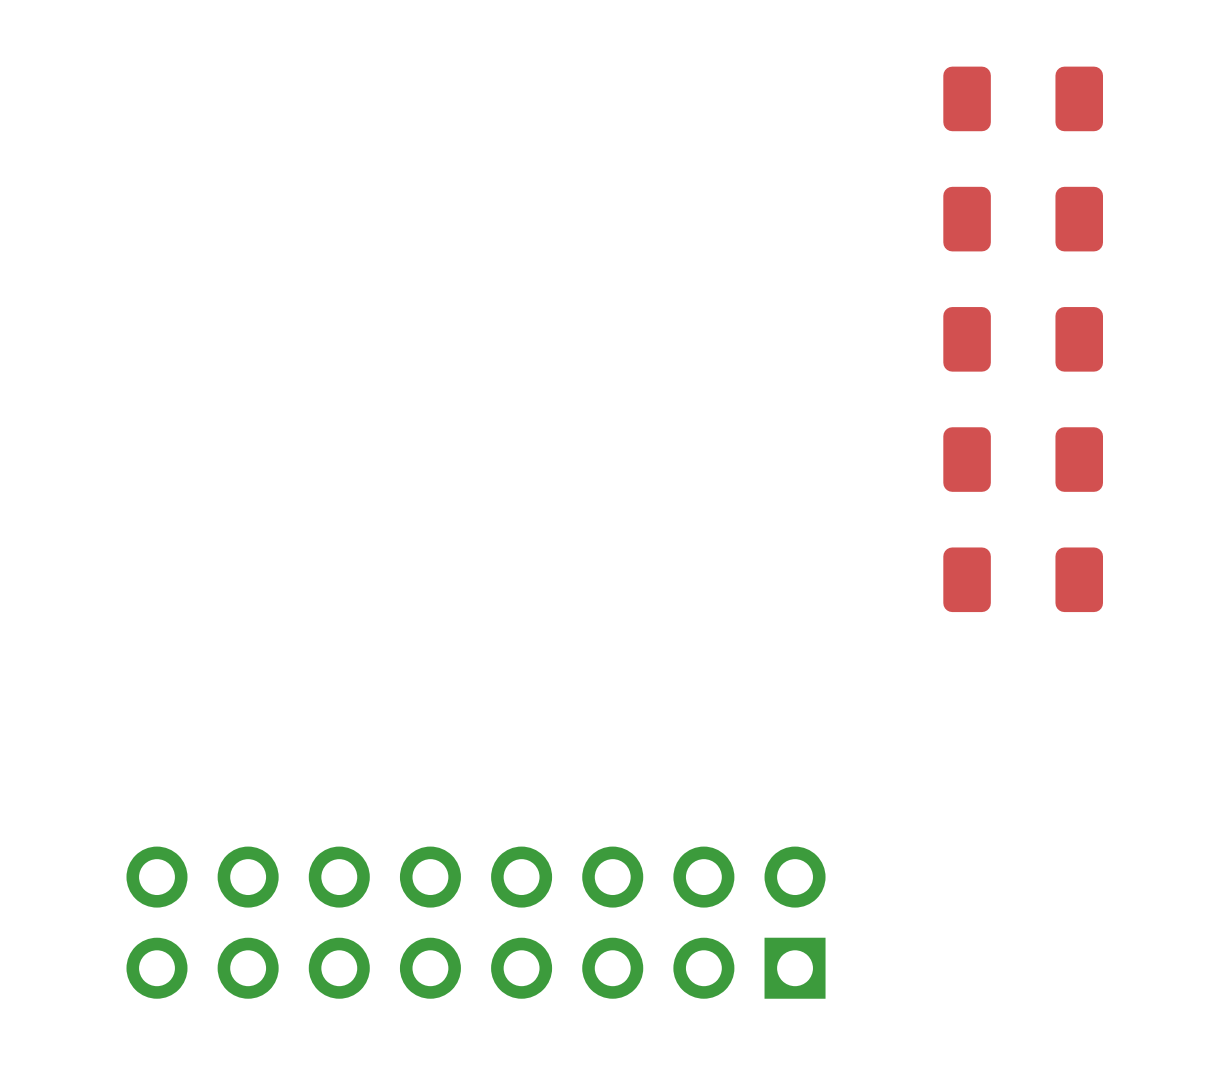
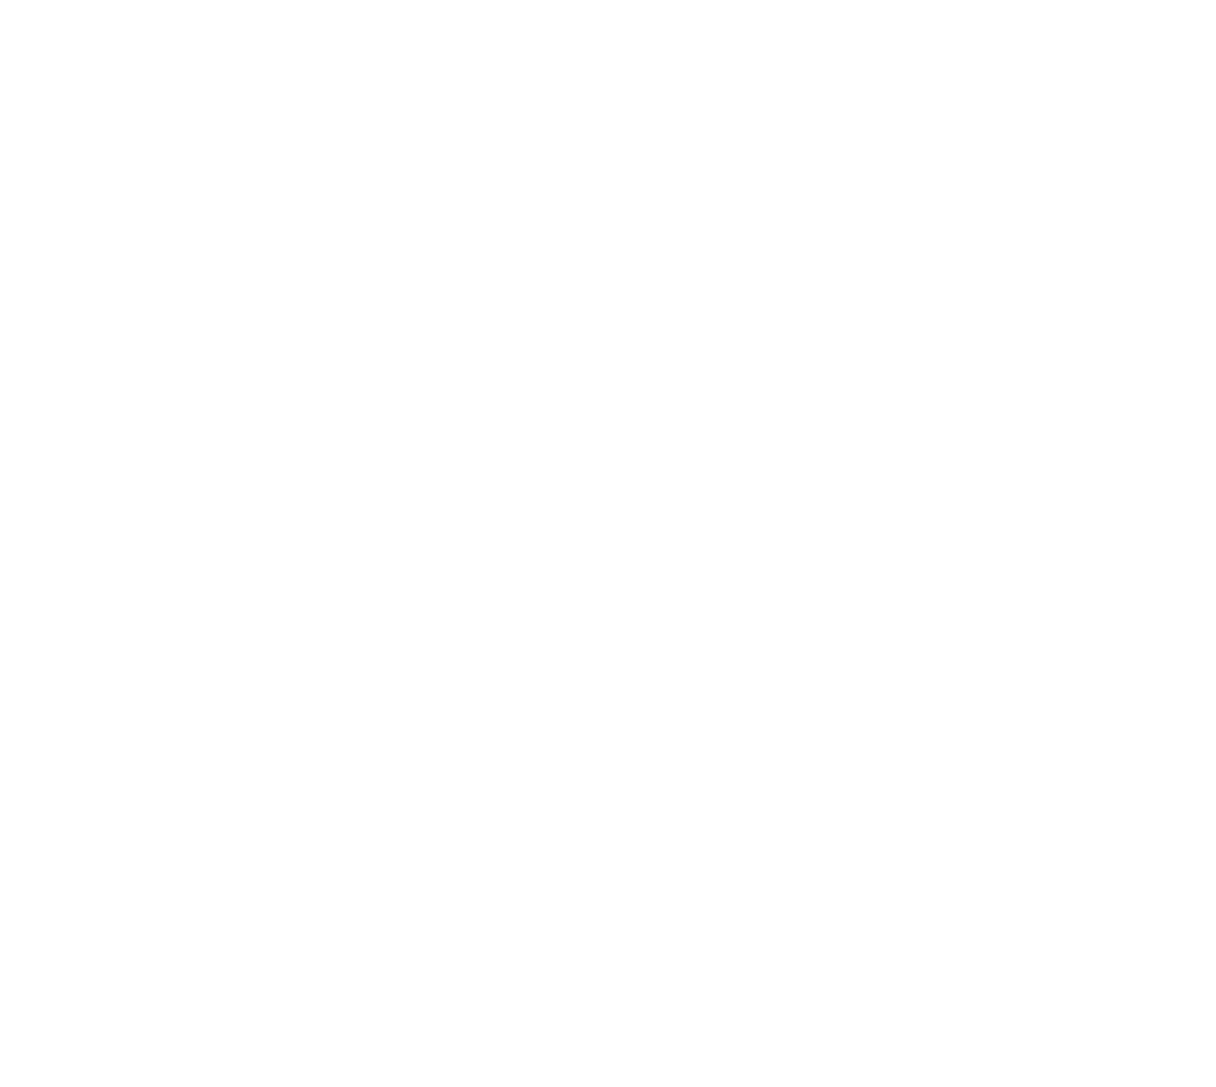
part: (1023, 98) -> none
part: (1023, 219) -> none
part: (1023, 339) -> none
part: (1023, 459) -> none
part: (1023, 579) -> none
part: (476, 922) -> none

